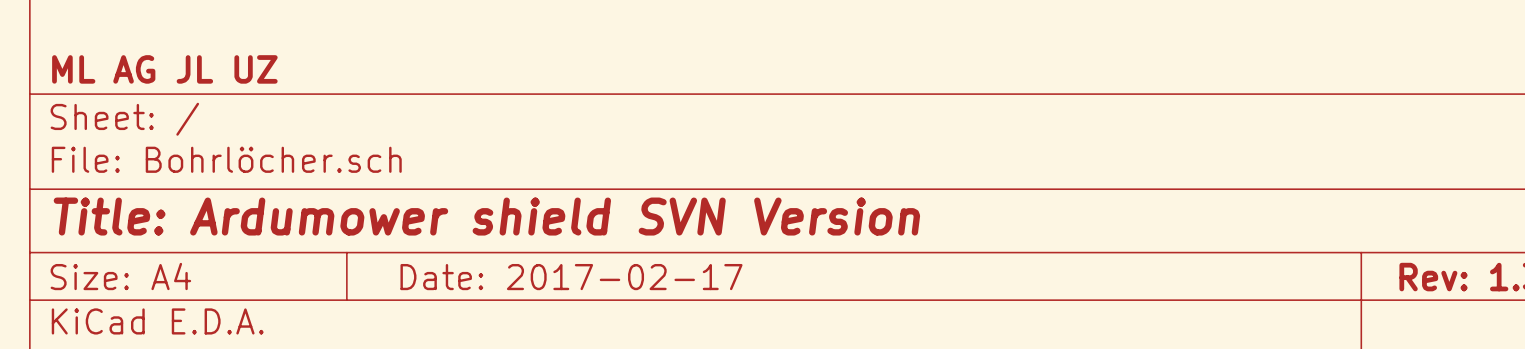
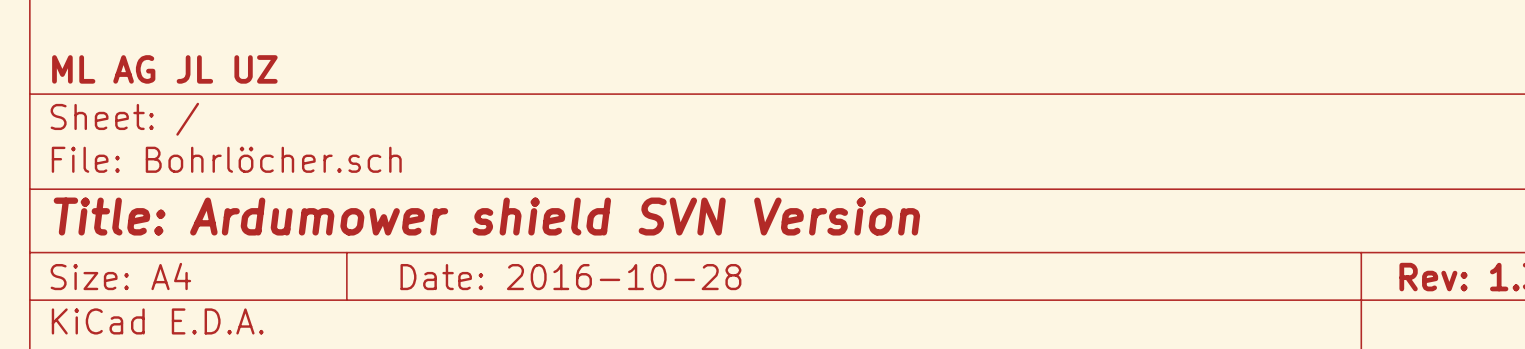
title block: Date: 2017-02-17 (571, 277) -> Date: 2016-10-28 (570, 277)

